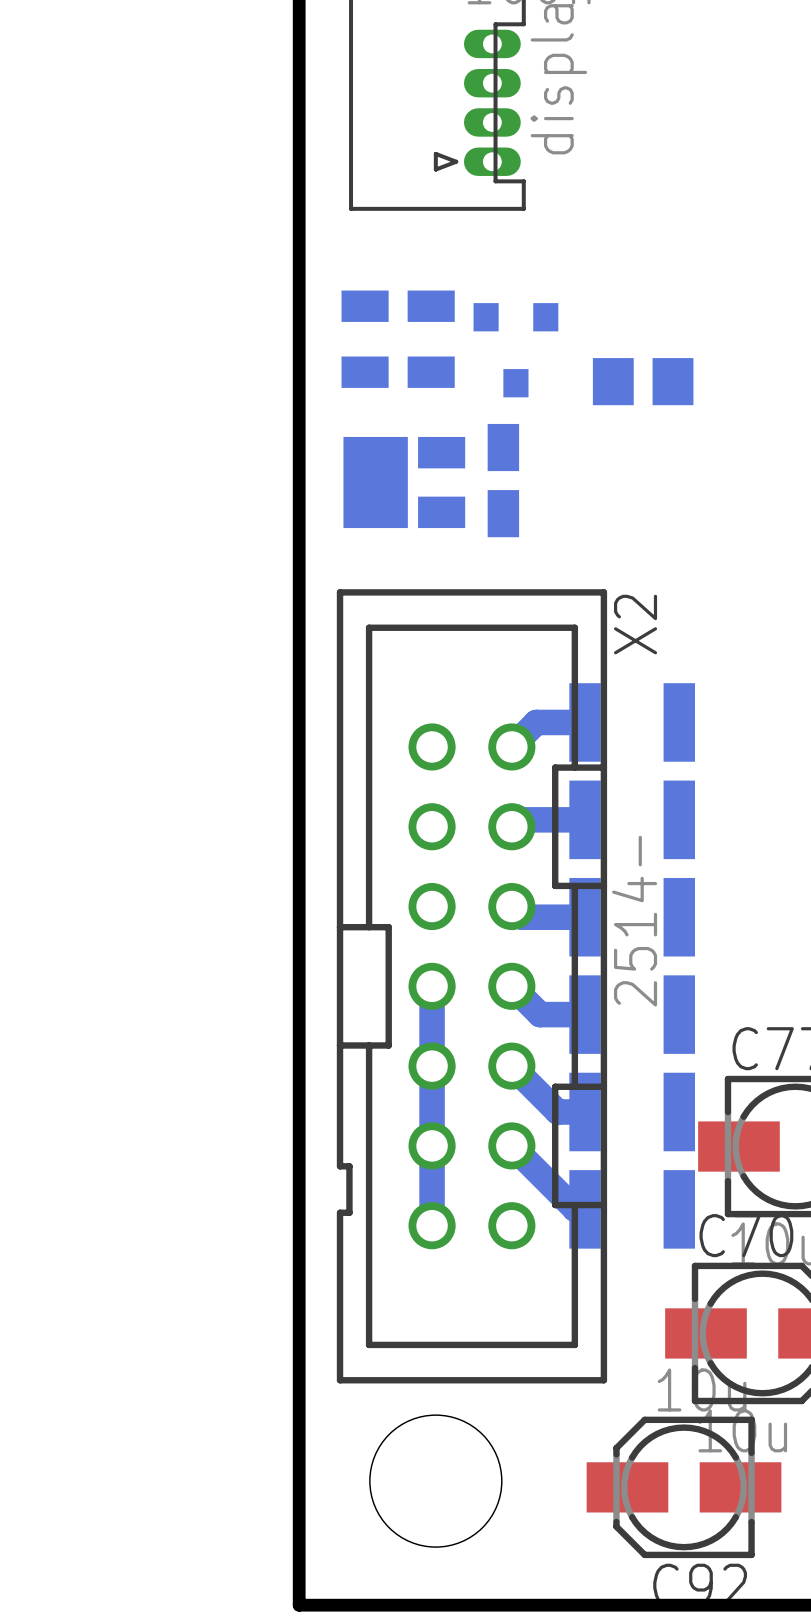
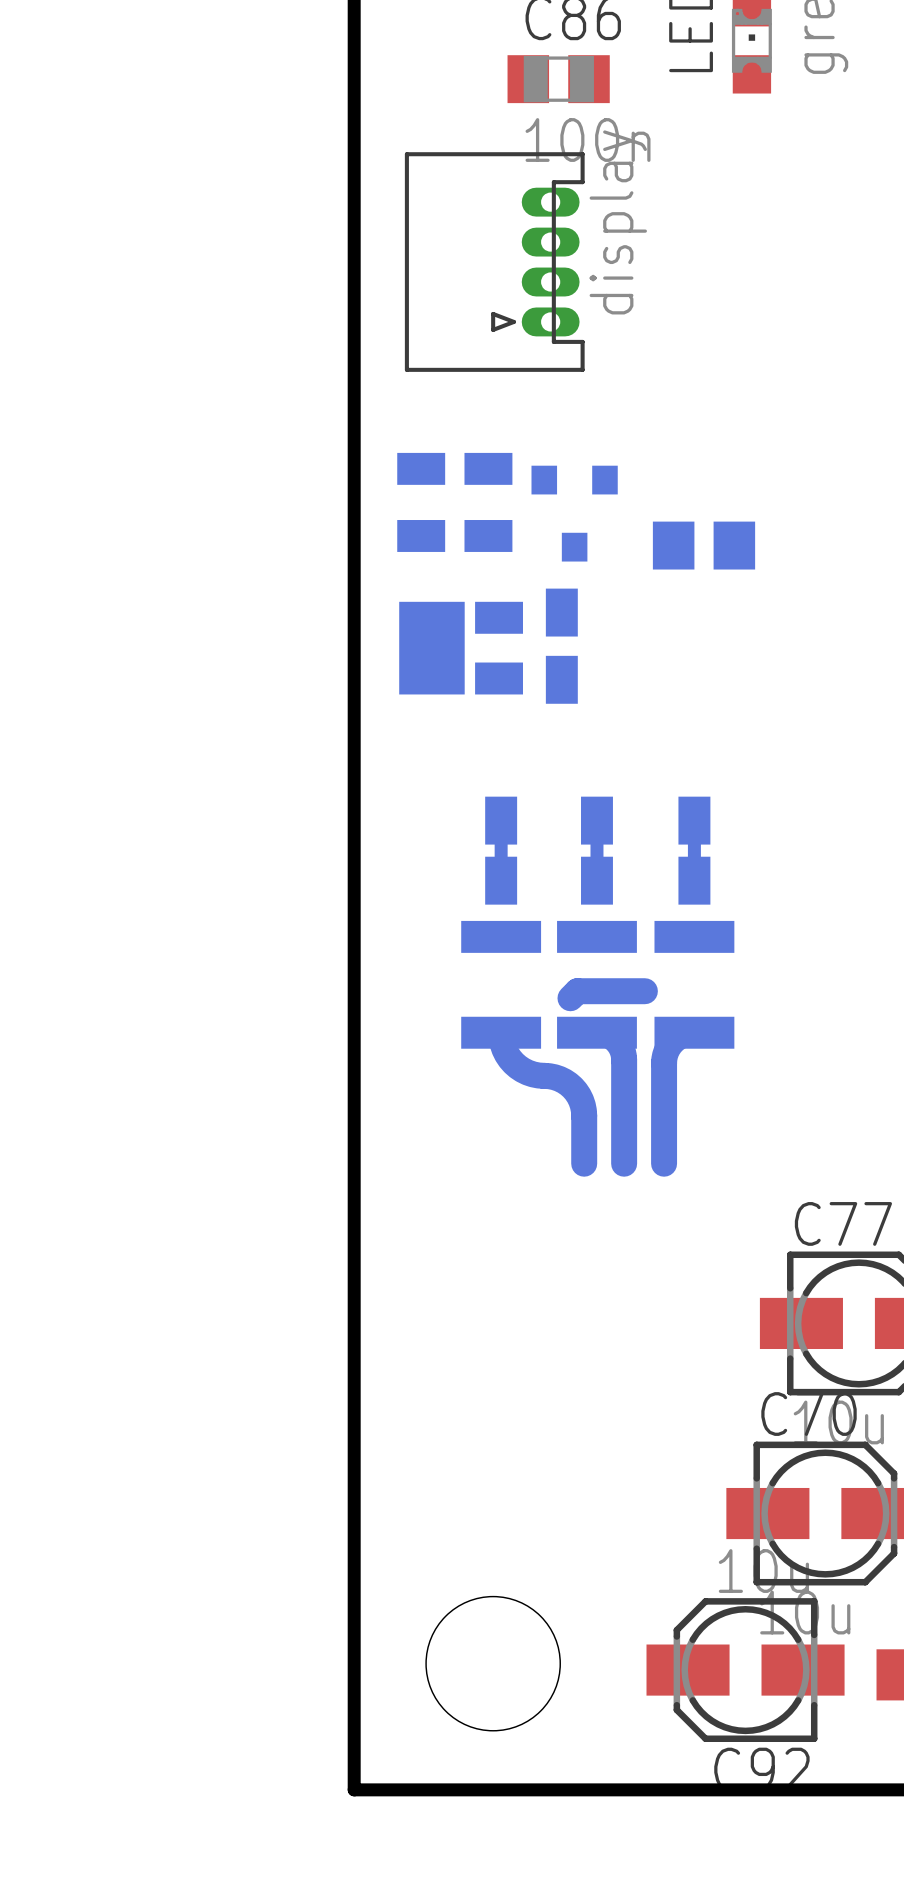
part: none -> (501, 850)
part: none -> (596, 850)
part: none -> (694, 850)
bottom track: (585, 722) (536, 722) (511, 746) -> none
part: (632, 722) -> none
part: none -> (501, 984)
part: none -> (596, 984)
part rotation: 0° (632, 819) -> 90° clockwise (694, 984)
bottom track: none -> (501, 1032) (504, 1049) (518, 1066) (533, 1074) (559, 1078) (568, 1084) (578, 1095) (583, 1110) (584, 1163)
bottom track: none -> (596, 1032) (613, 1038) (623, 1052) (624, 1163)
bottom track: none -> (694, 1032) (686, 1033) (675, 1039) (670, 1044) (665, 1055) (664, 1163)
bottom track: (511, 906) (522, 917) (585, 917) -> none
part: (632, 917) -> none
bottom track: (432, 986) (432, 1225) -> none
X2: 2514- (471, 986) -> none
bottom track: (511, 986) (540, 1014) (585, 1014) -> none
part: (632, 1014) -> none
bottom track: (511, 1066) (557, 1111) (585, 1111) -> none
part: (632, 1111) -> none
bottom track: (511, 1145) (575, 1209) (585, 1209) -> none
part: (632, 1209) -> none

